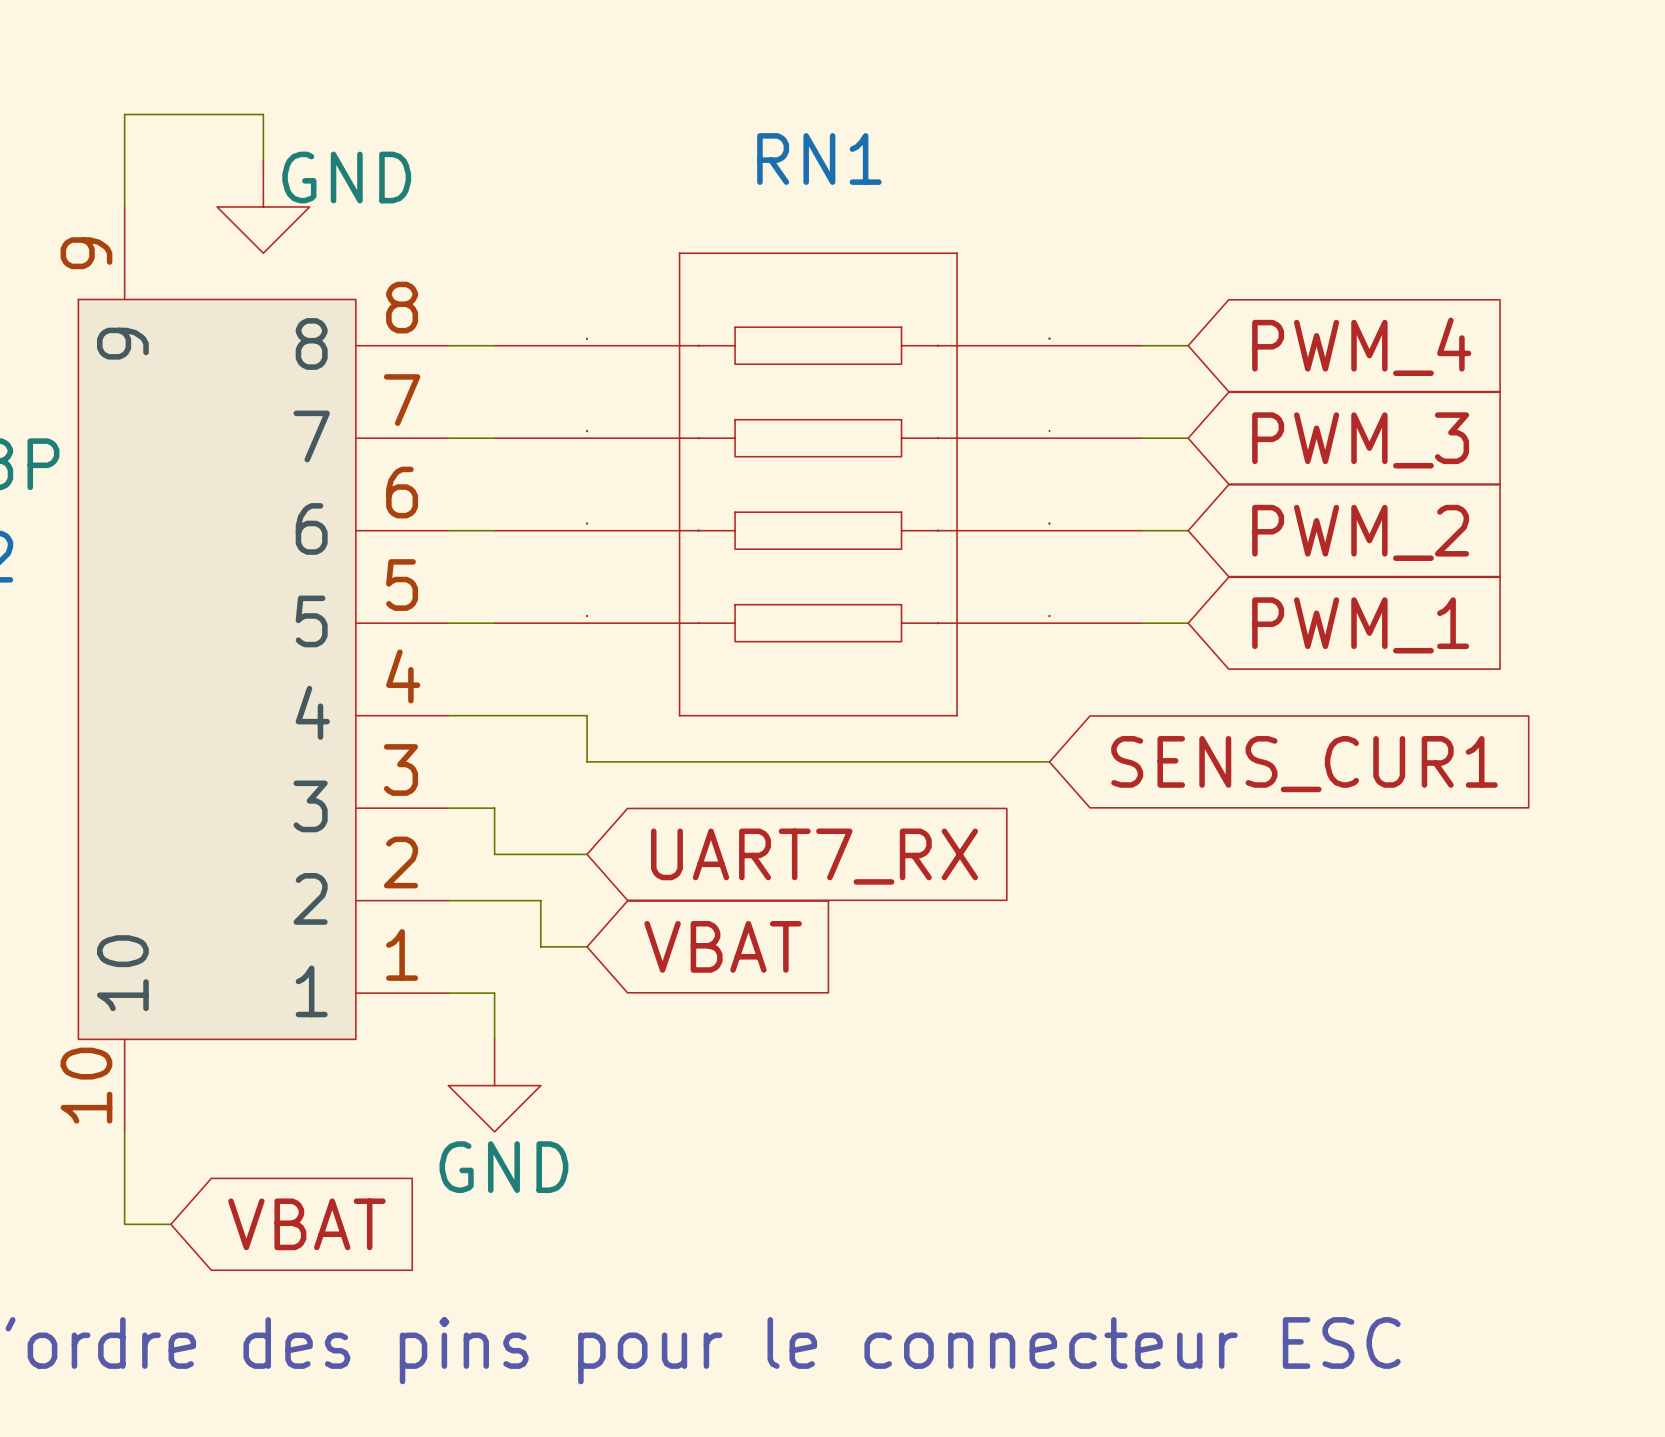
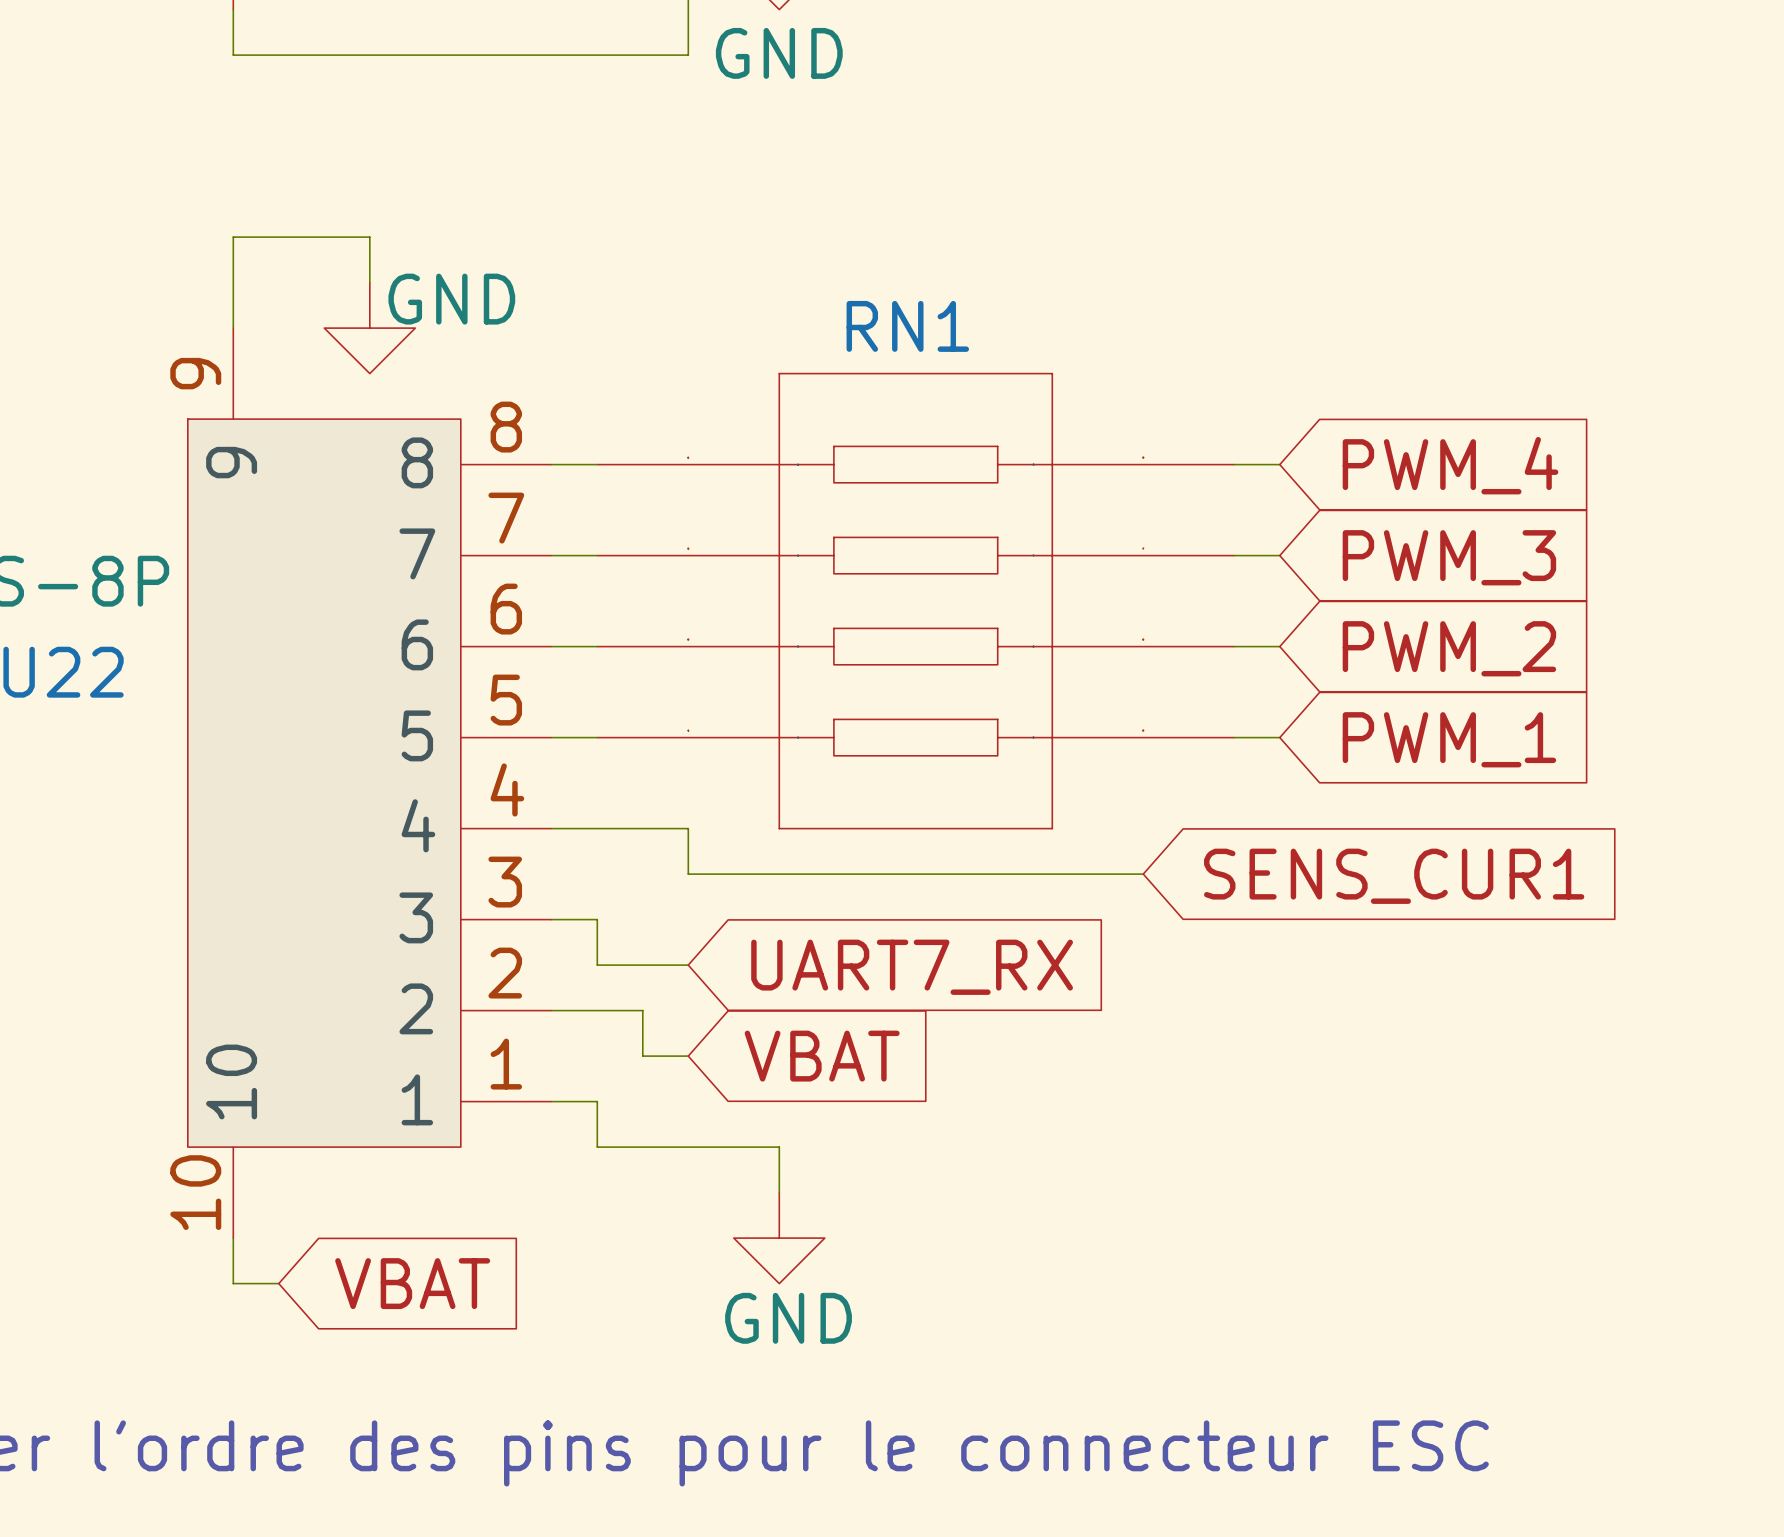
RN1 name position: RN1 (819, 159) -> RN1 (907, 326)
wire: none -> (597, 1147) (779, 1147) (779, 1192)
power symbol position: GND (494, 1085) -> GND (779, 1238)
wire: (124, 1178) (124, 1224) (170, 1224) -> (233, 1283) (278, 1283)
global label position: VBAT (306, 1224) -> VBAT (412, 1283)

